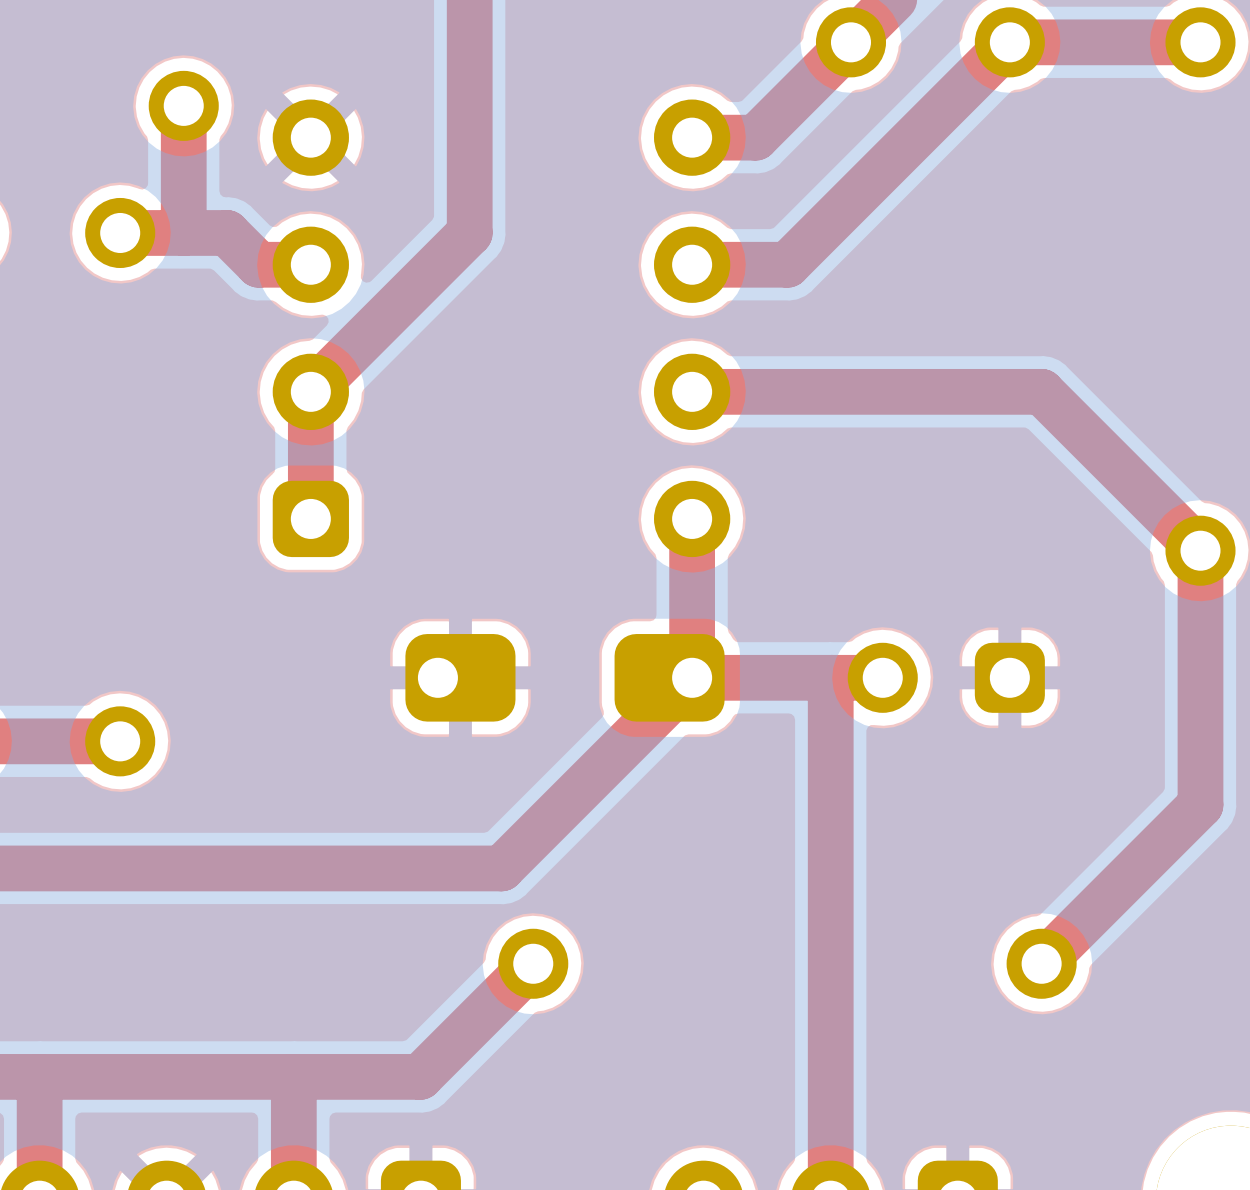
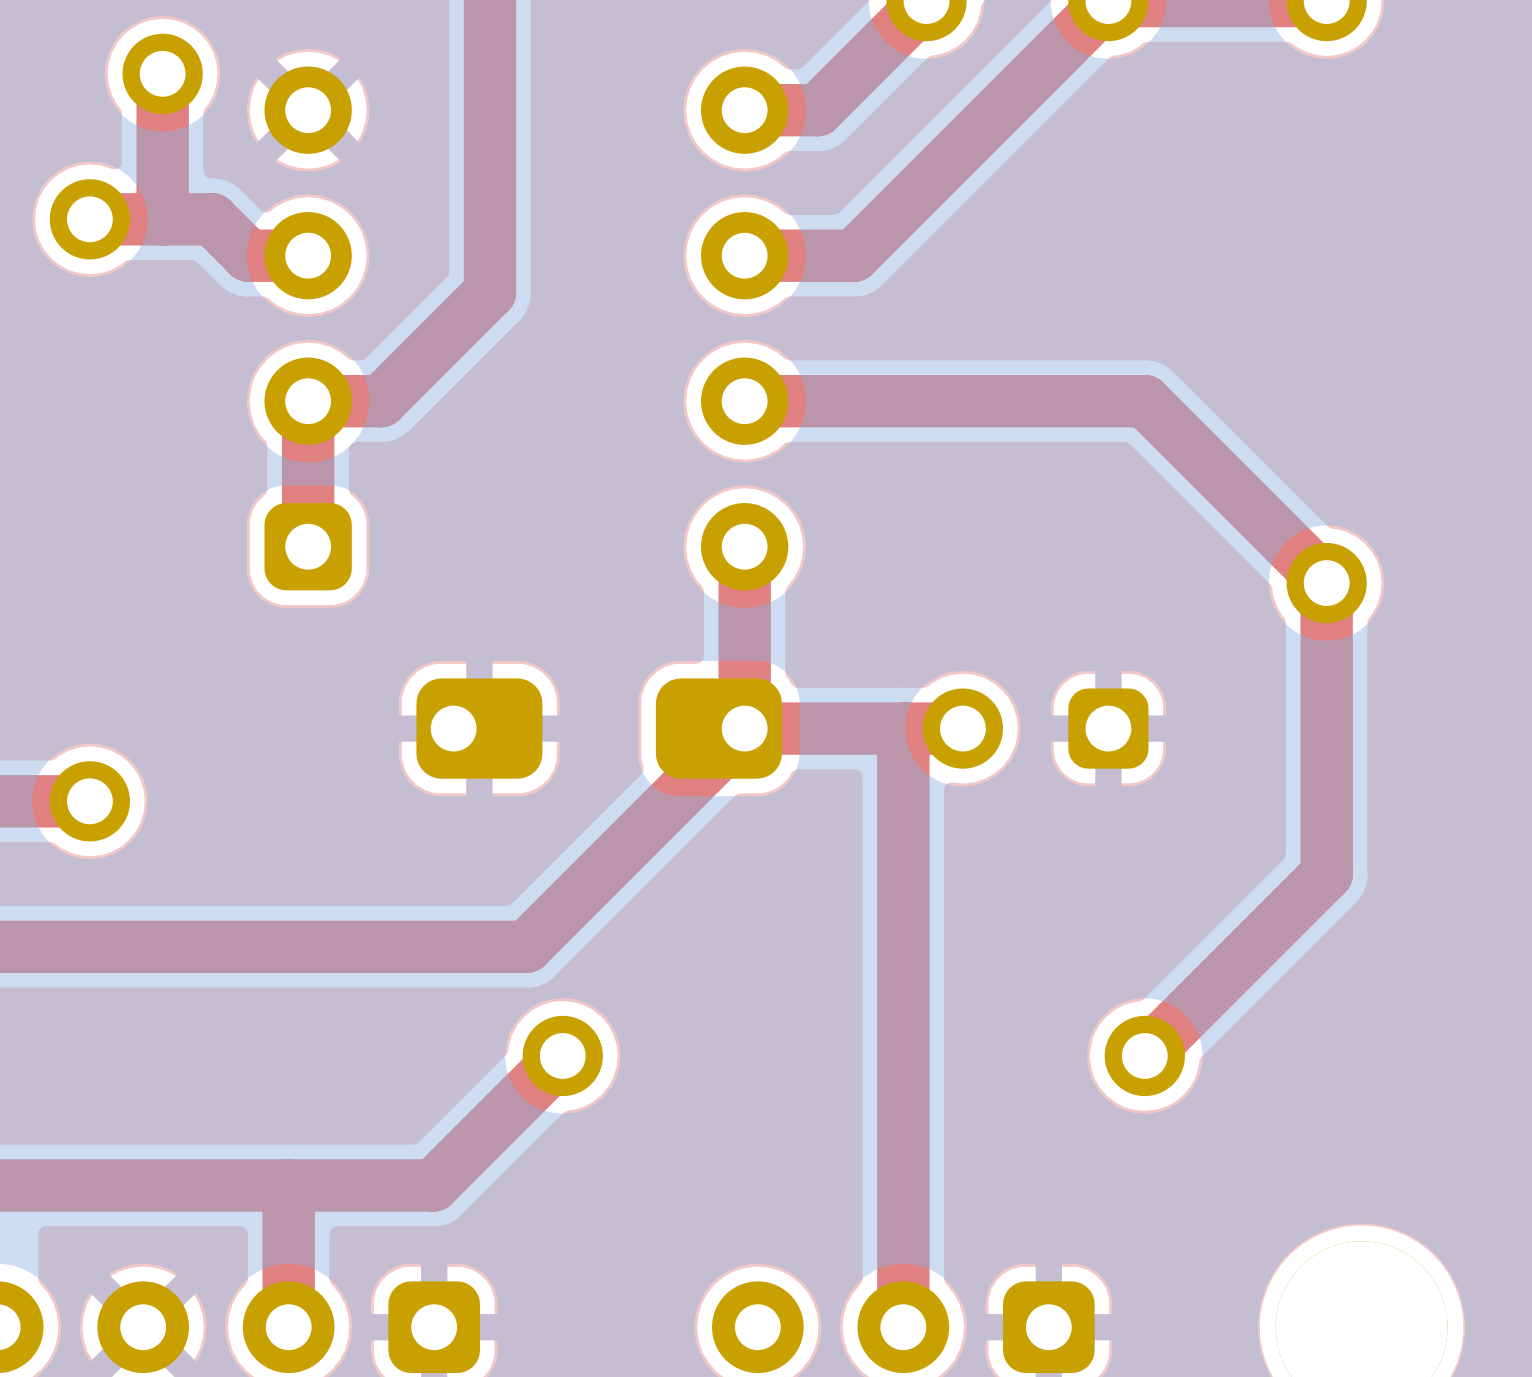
top track: (469, 232) (310, 391) -> (490, 219) (490, 292) (380, 401) (308, 401)

